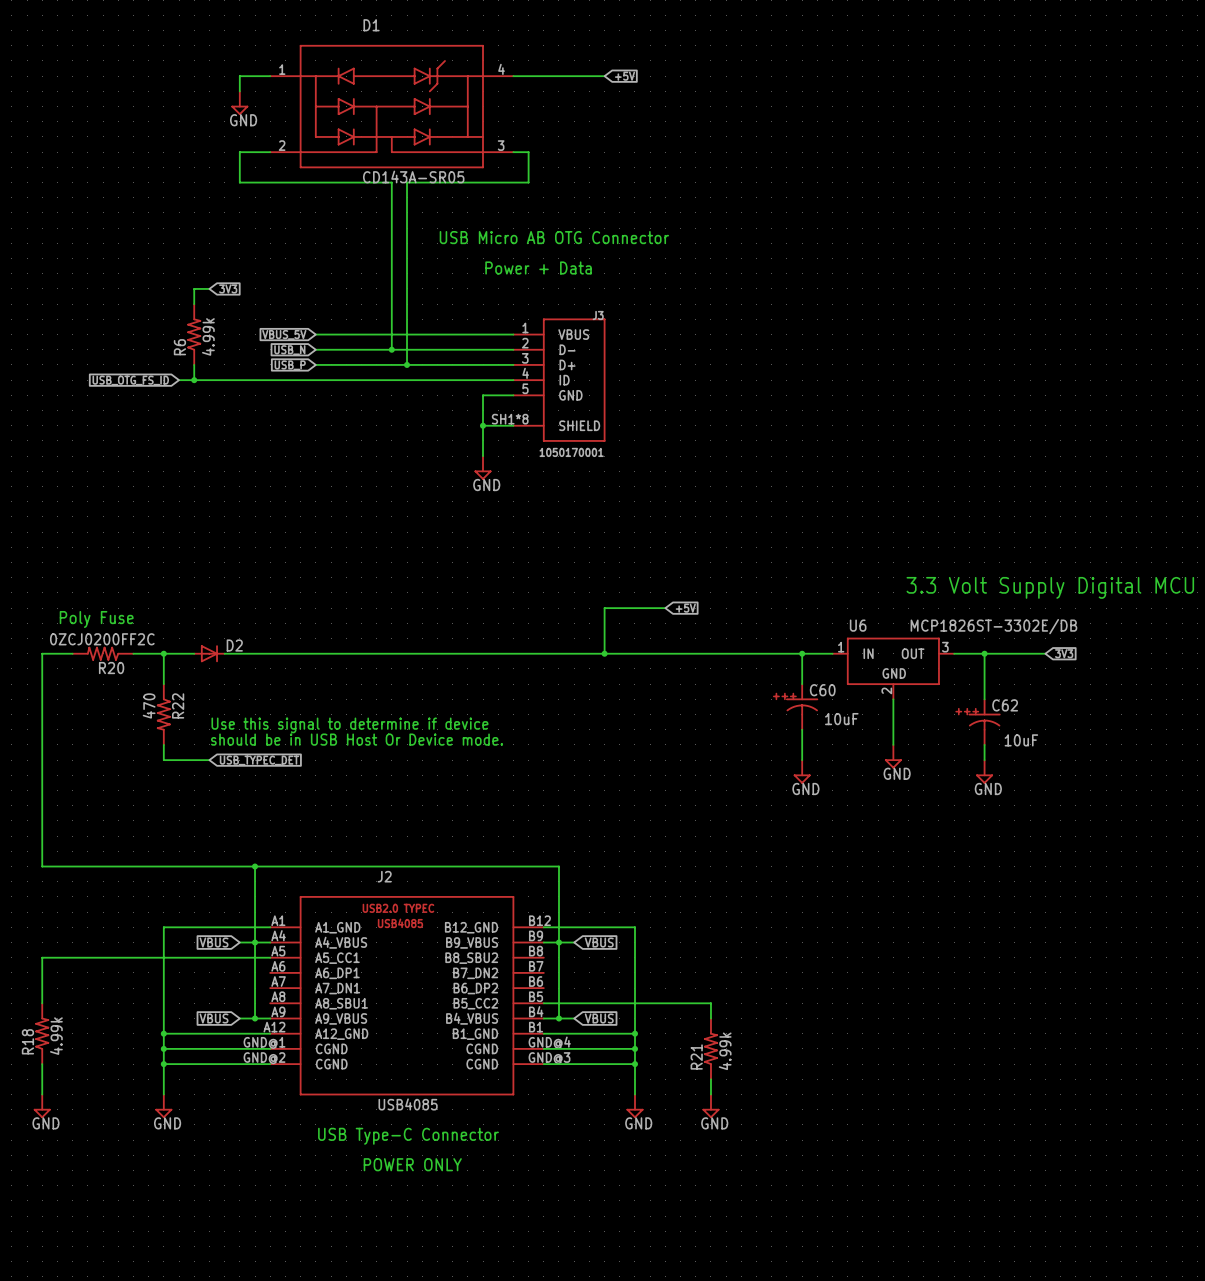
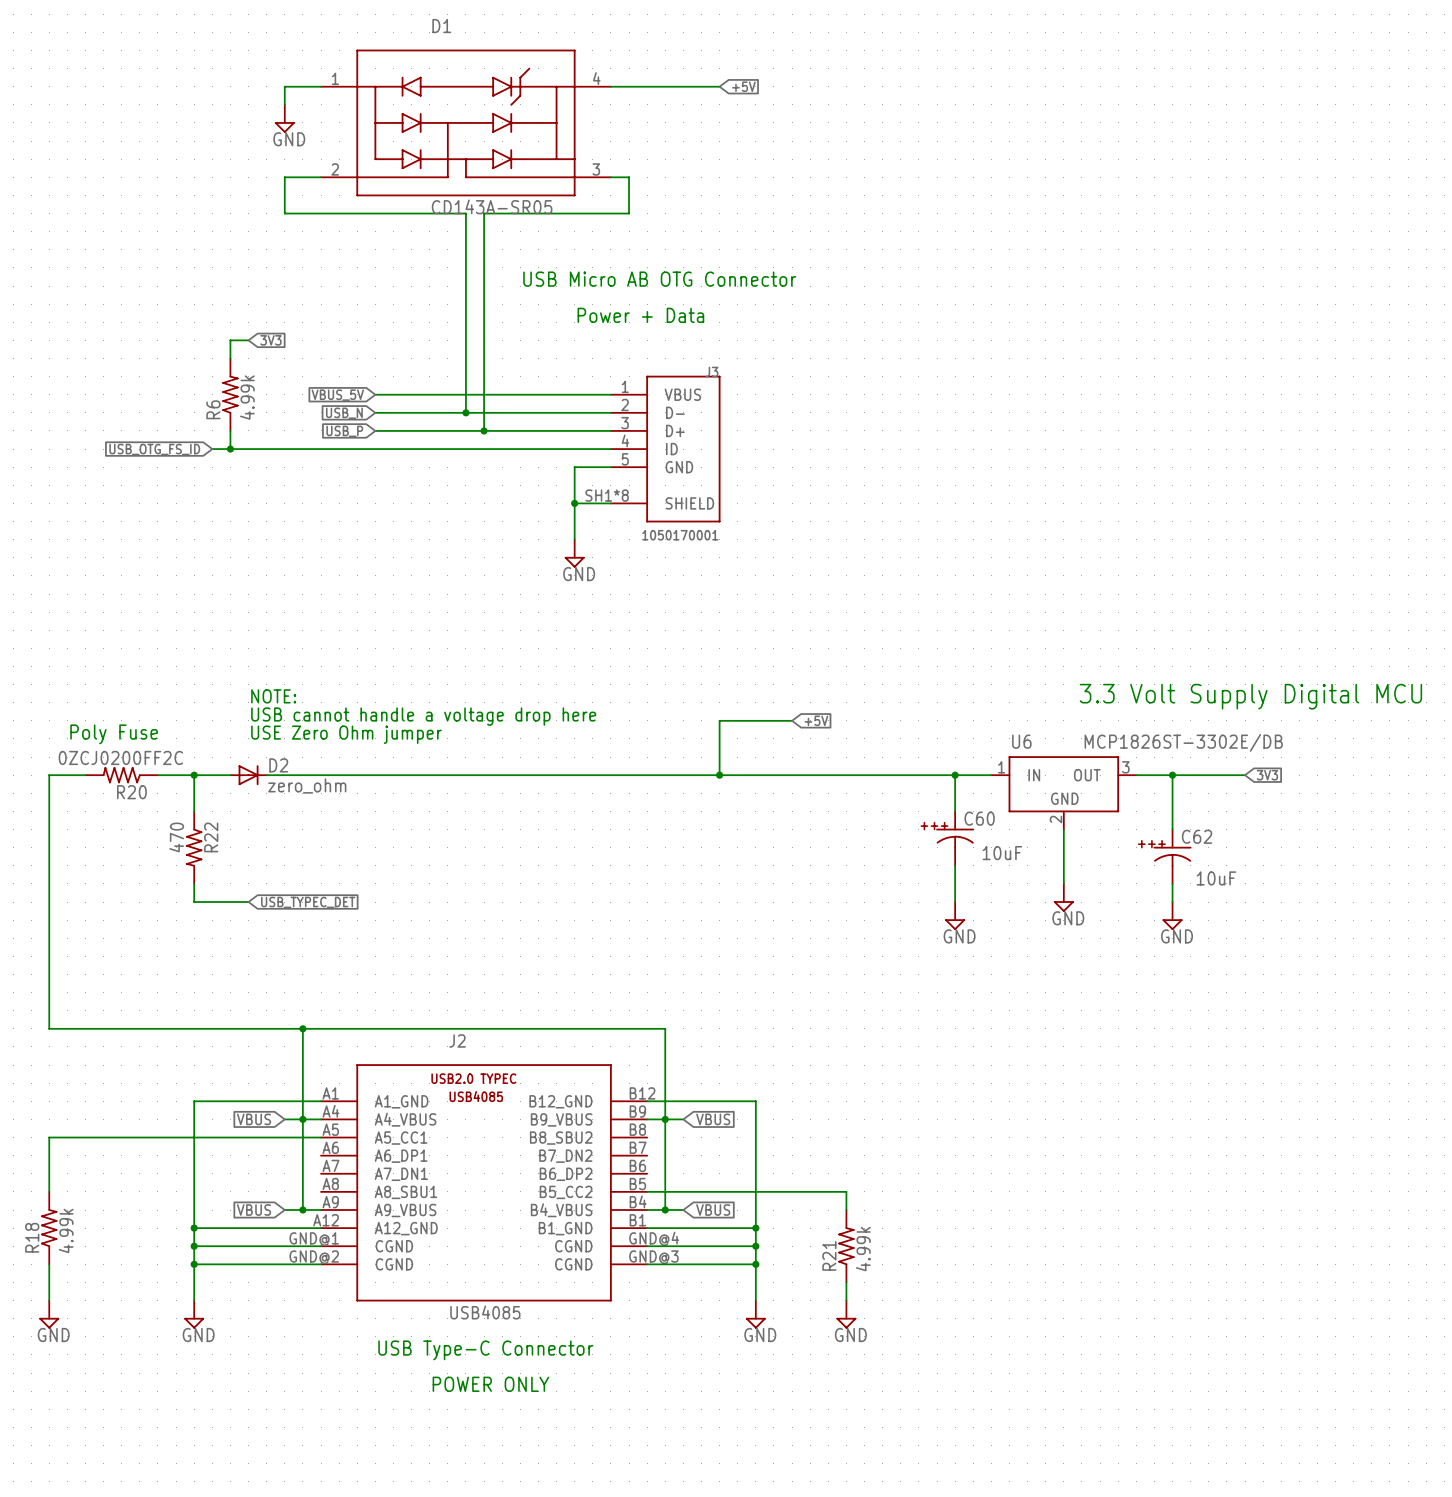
text: none -> NOTE: (273, 696)
text: none -> USB cannot handle a voltage drop here (423, 716)
text: none -> USE Zero Ohm jumper (346, 734)
D2 value: none -> zero_ohm (307, 785)
text: Use this signal to determine if device (349, 725) -> none
text: should be in USB Host Or Device mode. (357, 739) -> none

